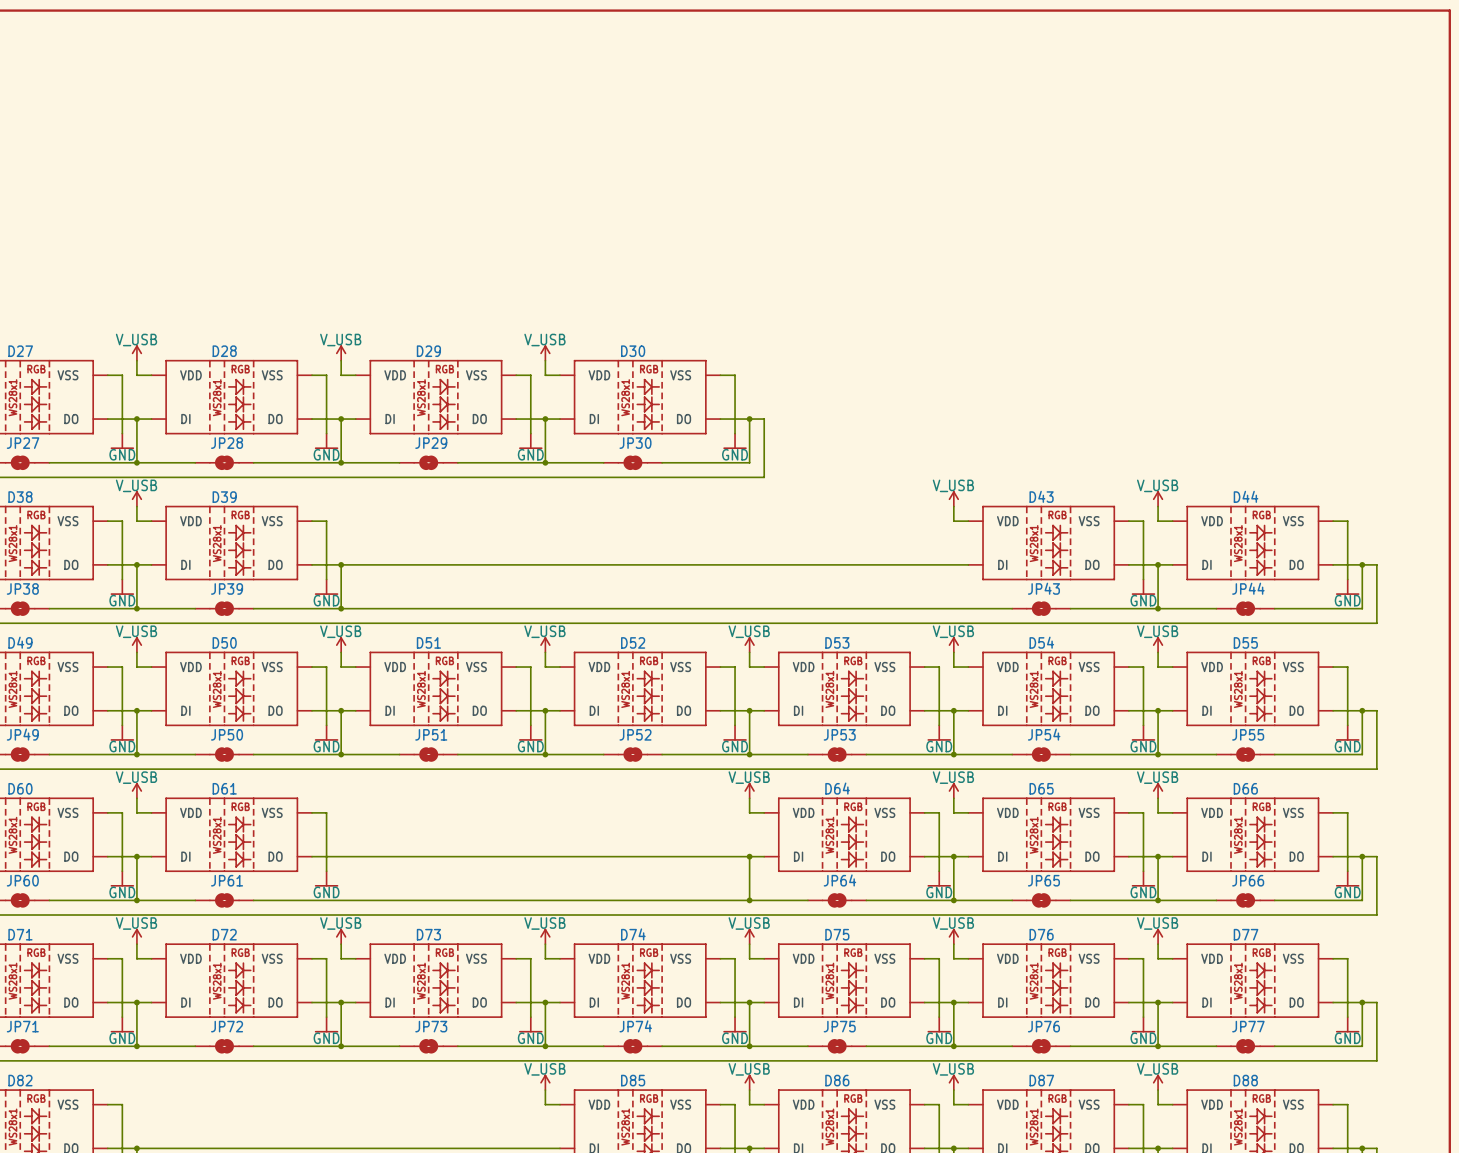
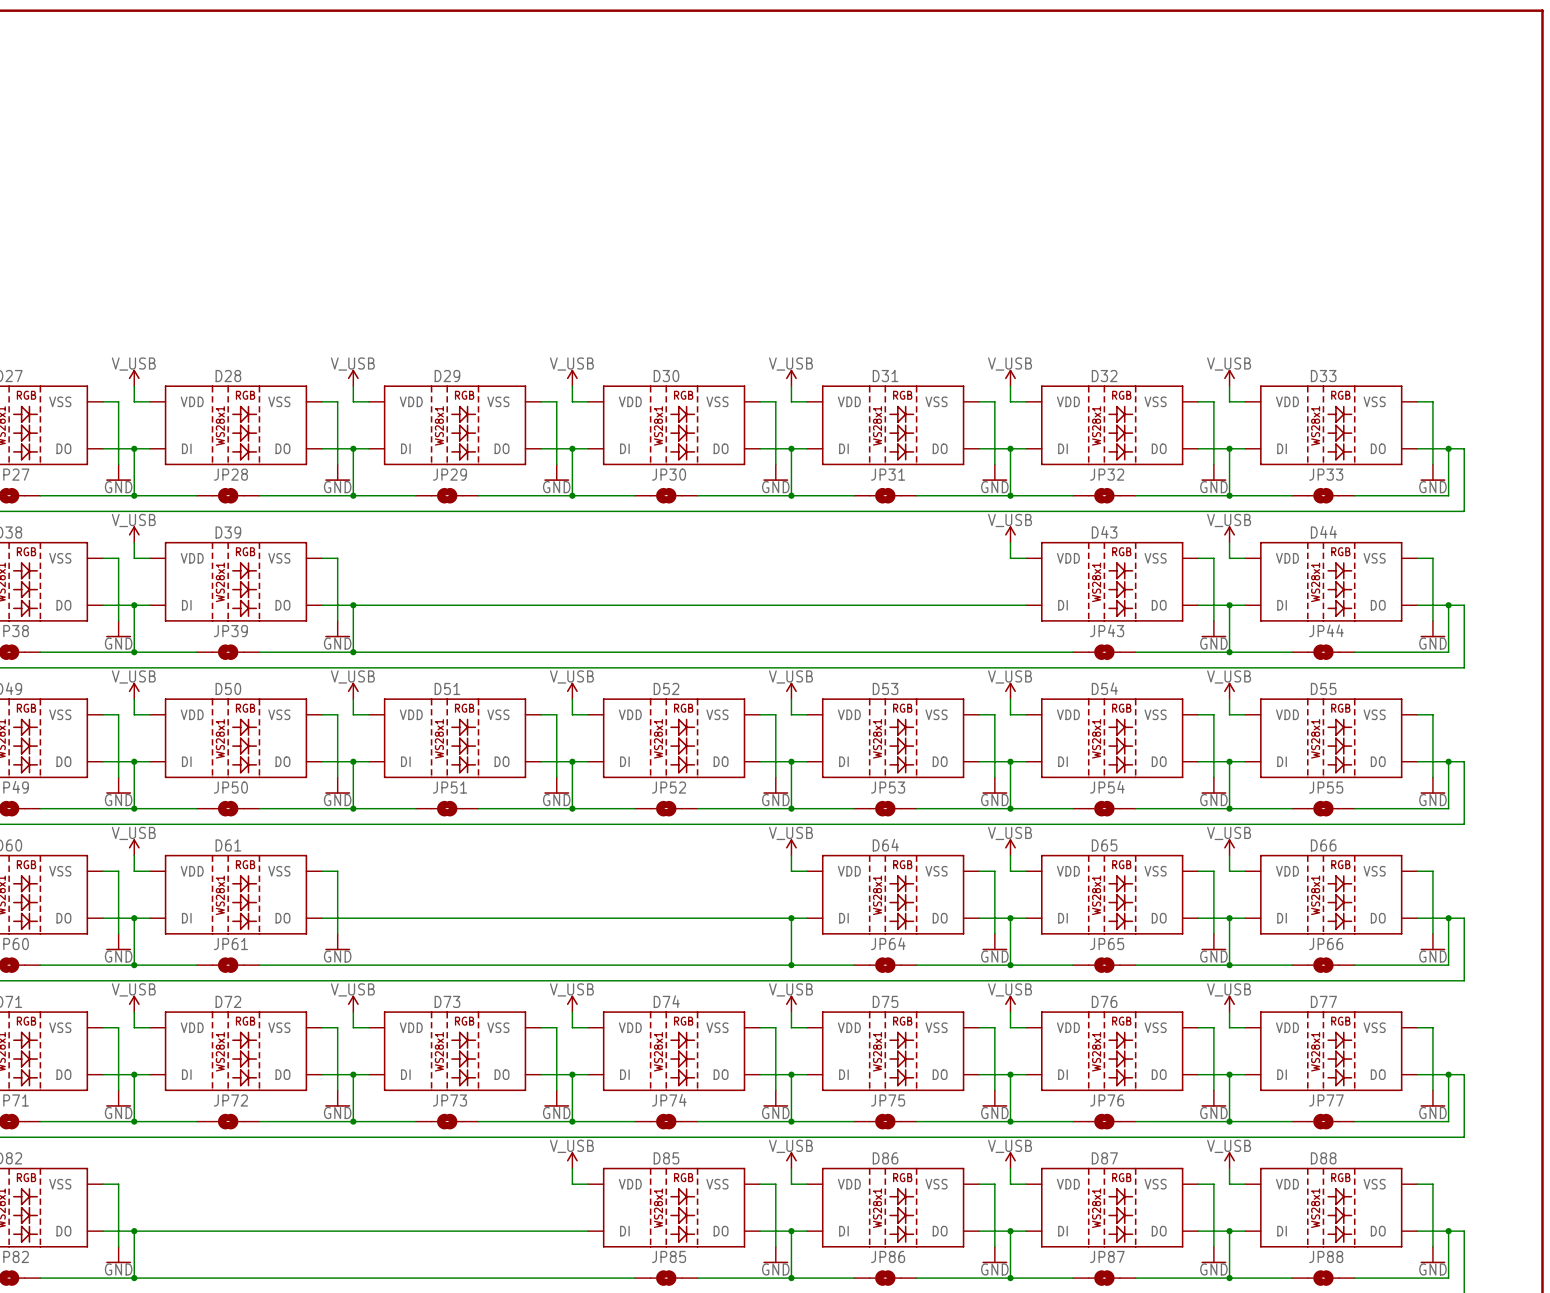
power symbol: none -> V_USB (791, 377)
power symbol: none -> V_USB (1010, 377)
power symbol: none -> V_USB (1229, 377)
wire: none -> (791, 386) (791, 401) (807, 401)
wire: none -> (1010, 386) (1010, 401) (1026, 401)
wire: none -> (1229, 386) (1229, 401) (1245, 401)
wire: none -> (979, 401) (994, 401) (994, 464)
wire: none -> (1198, 401) (1213, 401) (1213, 464)
wire: none -> (1417, 401) (1432, 401) (1432, 464)
D31: none -> (893, 425)
D32: none -> (1112, 425)
D33: none -> (1331, 425)
wire: (764, 419) (764, 477) -> (1417, 448) (1464, 448) (1464, 511) (807, 511)
wire: none -> (979, 448) (1026, 448)
wire: none -> (1010, 448) (1010, 495)
junction: none -> (1010, 448)
wire: none -> (1198, 448) (1245, 448)
wire: none -> (1229, 448) (1229, 495)
junction: none -> (1229, 448)
wire: none -> (1448, 448) (1448, 495) (1354, 495)
junction: none -> (1448, 448)
power symbol: none -> GND (994, 472)
power symbol: none -> GND (1213, 472)
power symbol: none -> GND (1432, 472)
wire: none -> (791, 495) (854, 495)
junction: none -> (791, 495)
JP31: none -> (885, 495)
wire: none -> (916, 495) (1073, 495)
junction: none -> (1010, 495)
JP32: none -> (1104, 495)
wire: none -> (1135, 495) (1292, 495)
junction: none -> (1229, 495)
JP33: none -> (1323, 495)

